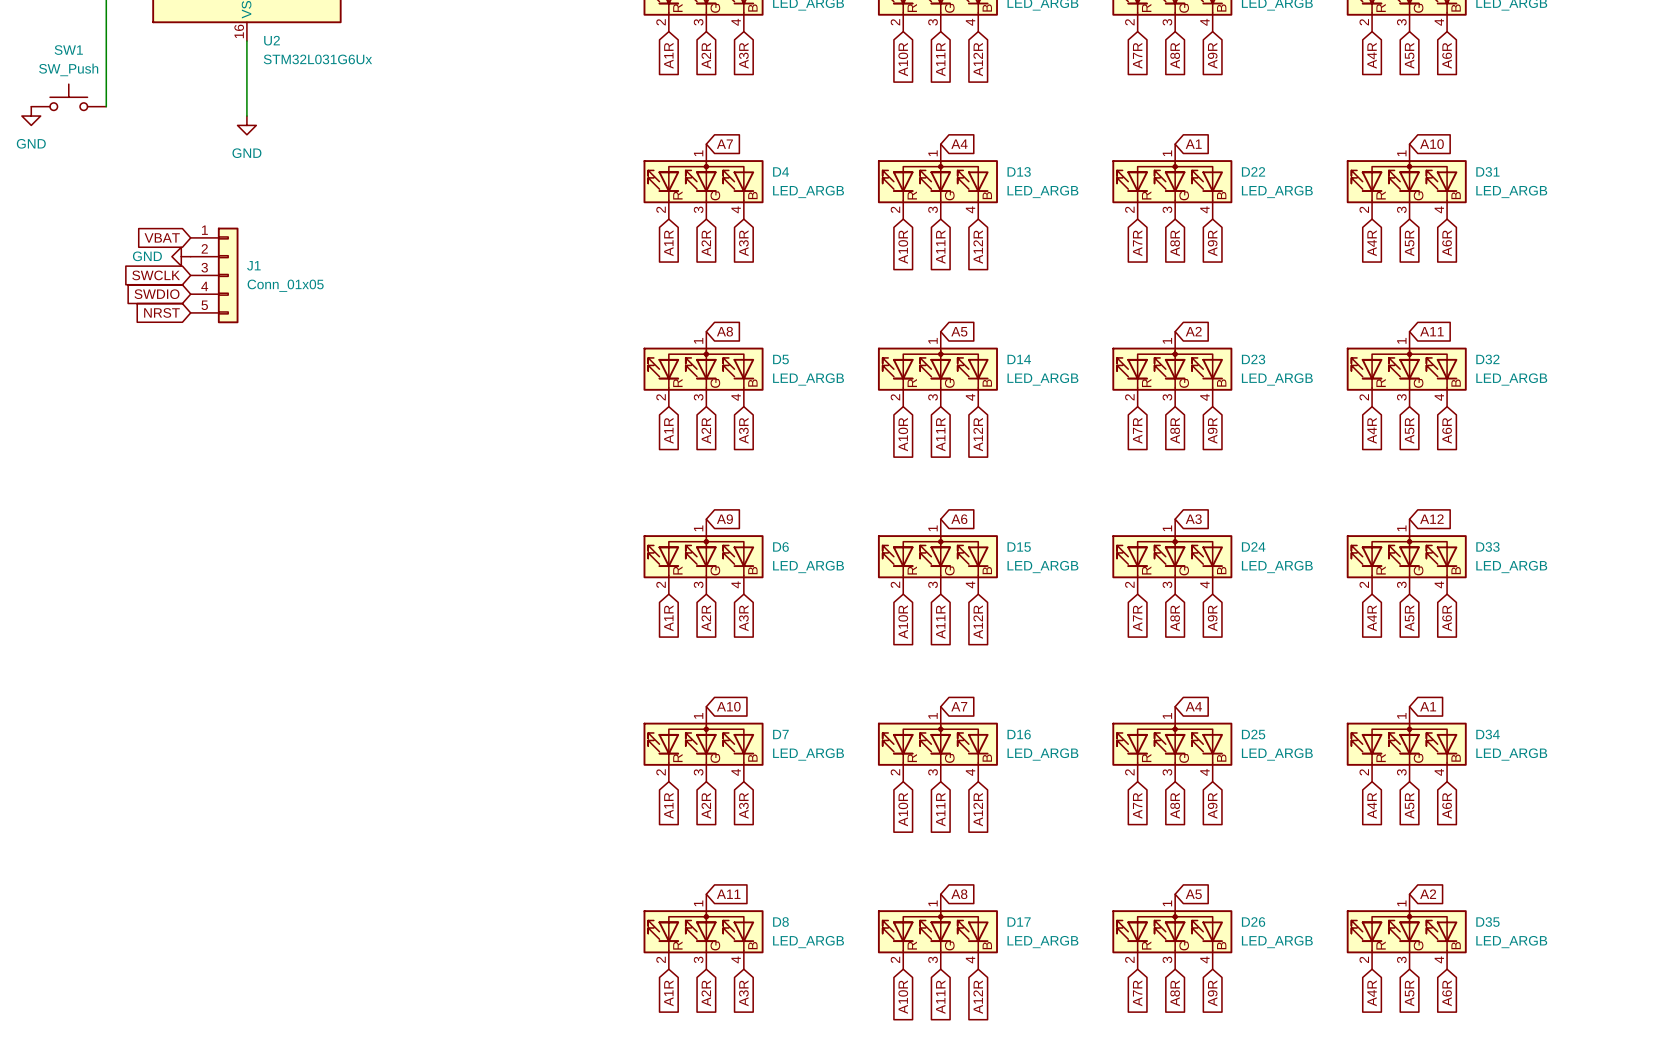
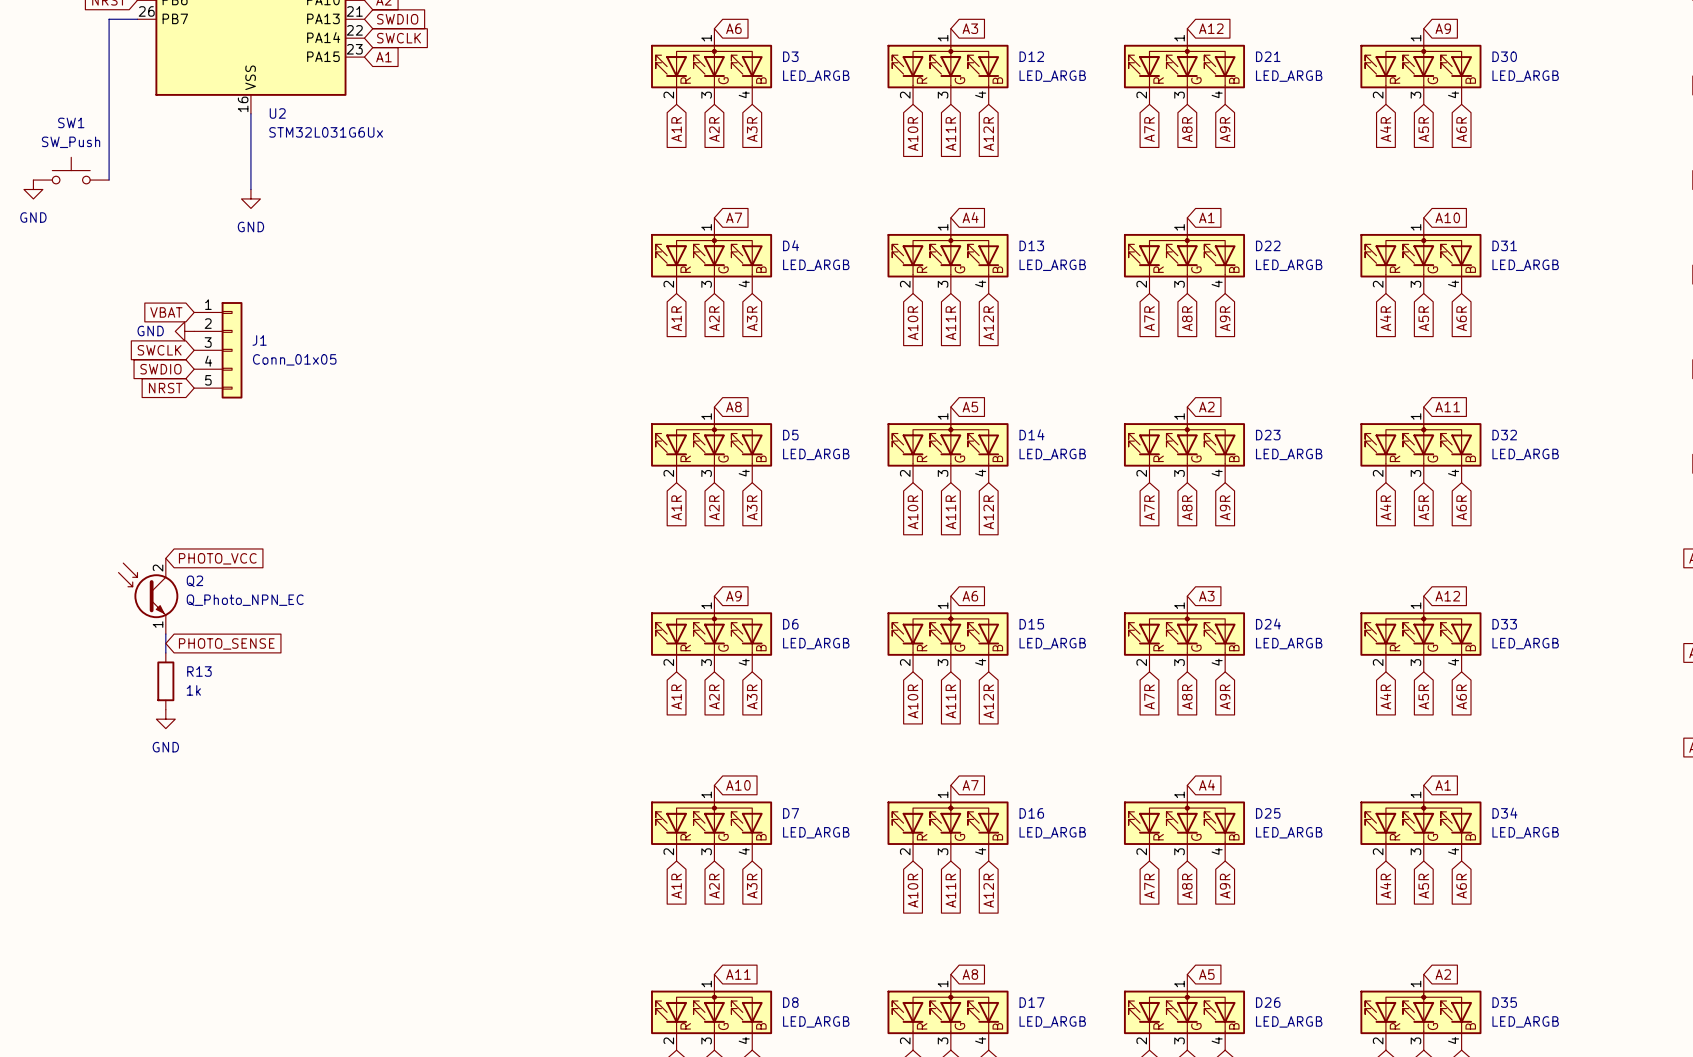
global label: none -> PHOTO_VCC (217, 558)
Q2: none -> Q_Photo_NPN_EC (148, 596)
wire: none -> (165, 634) (165, 652)
global label: none -> PHOTO_SENSE (226, 643)
R13: none -> 1k (165, 681)
power symbol: none -> GND (165, 719)

